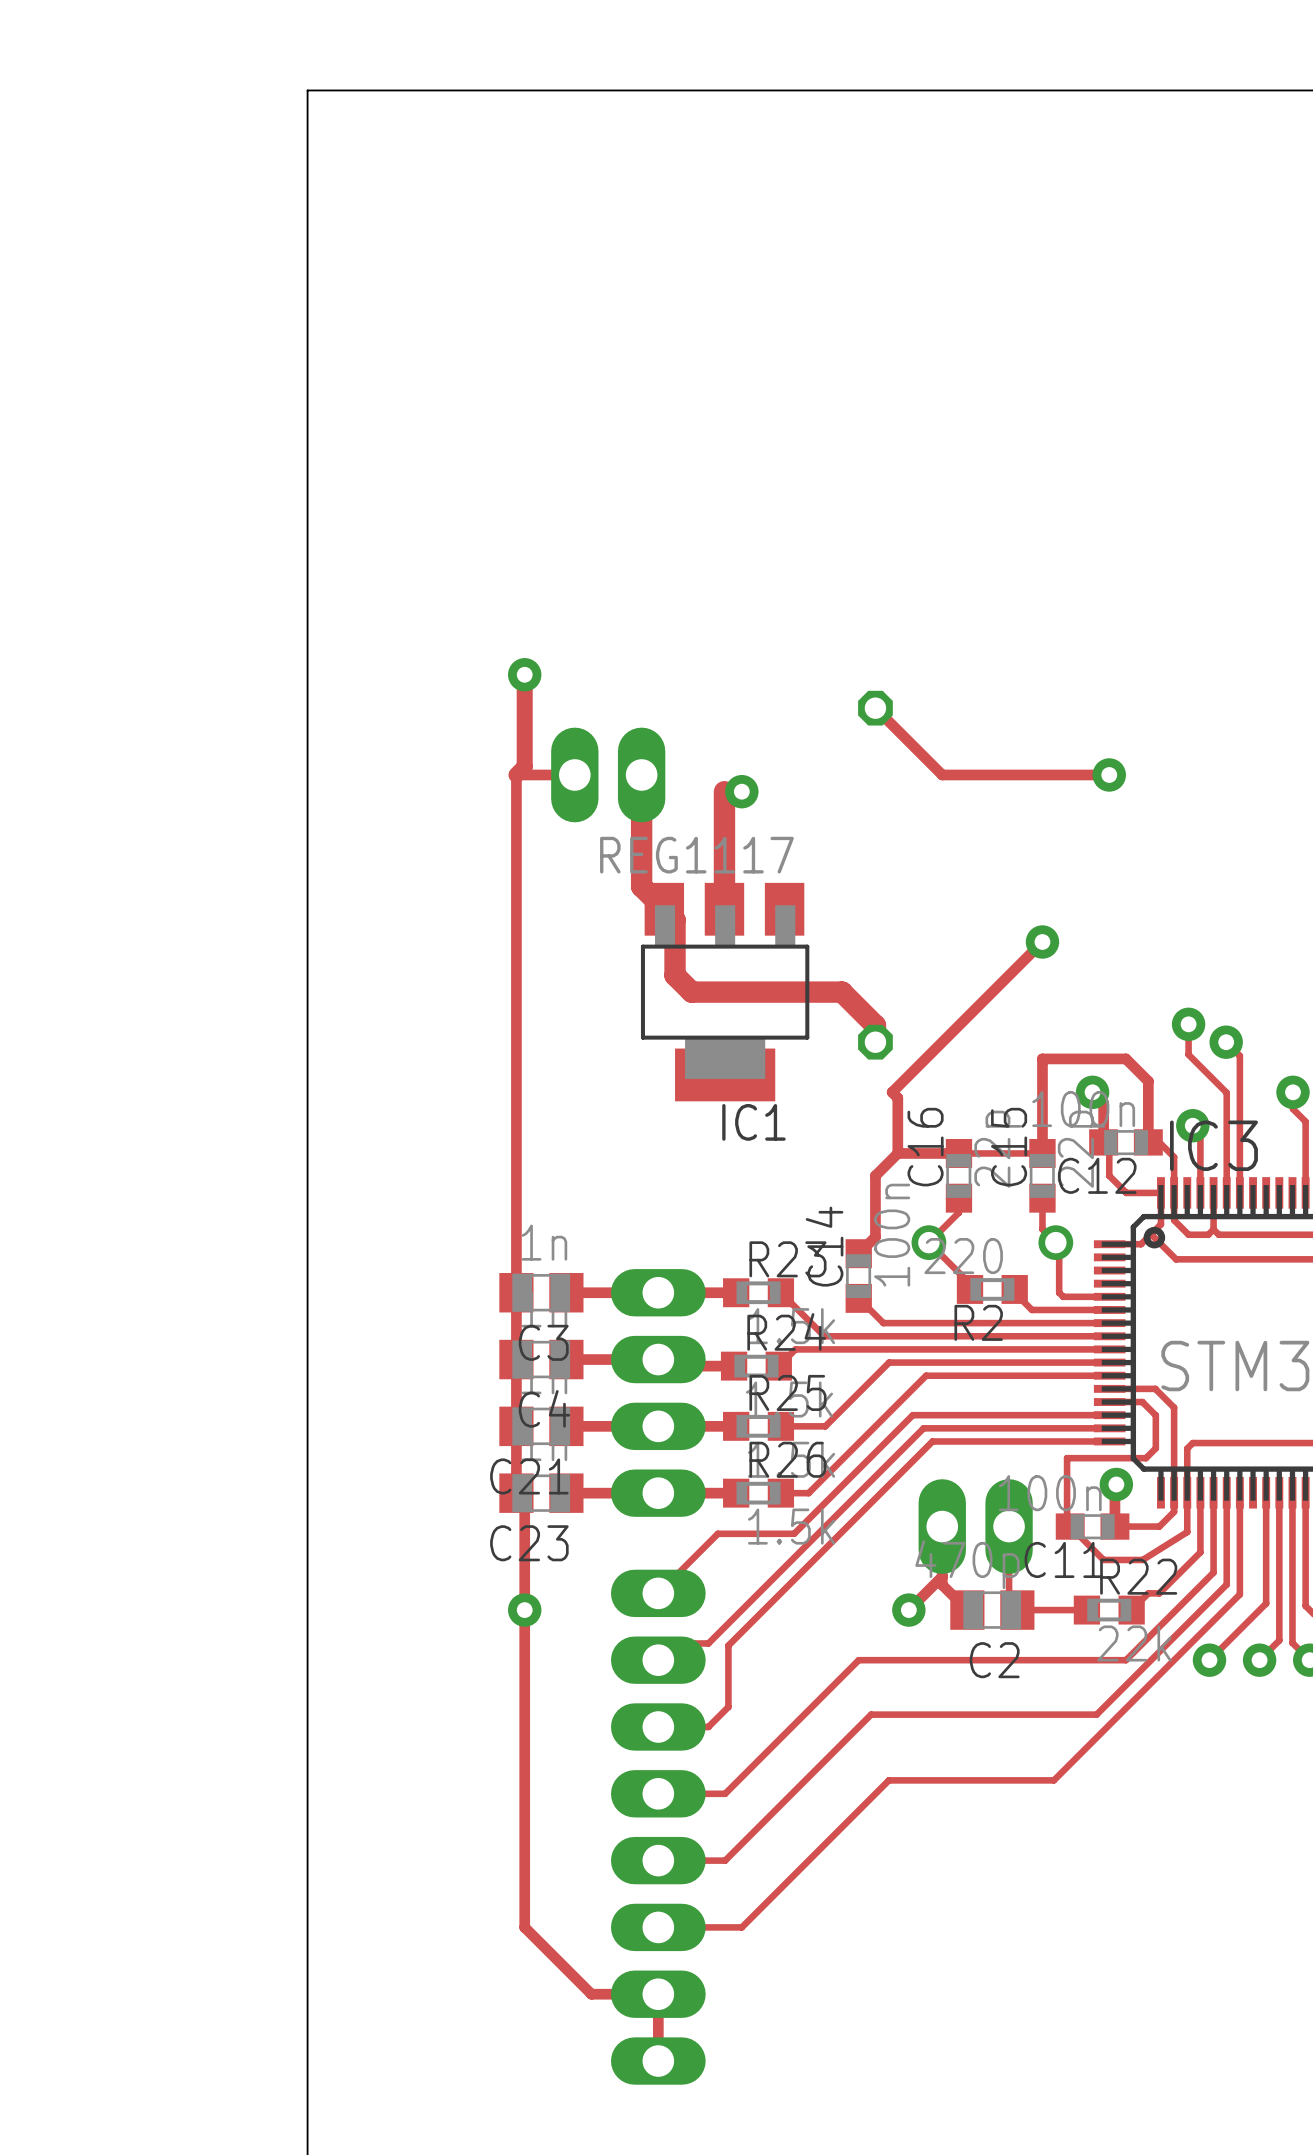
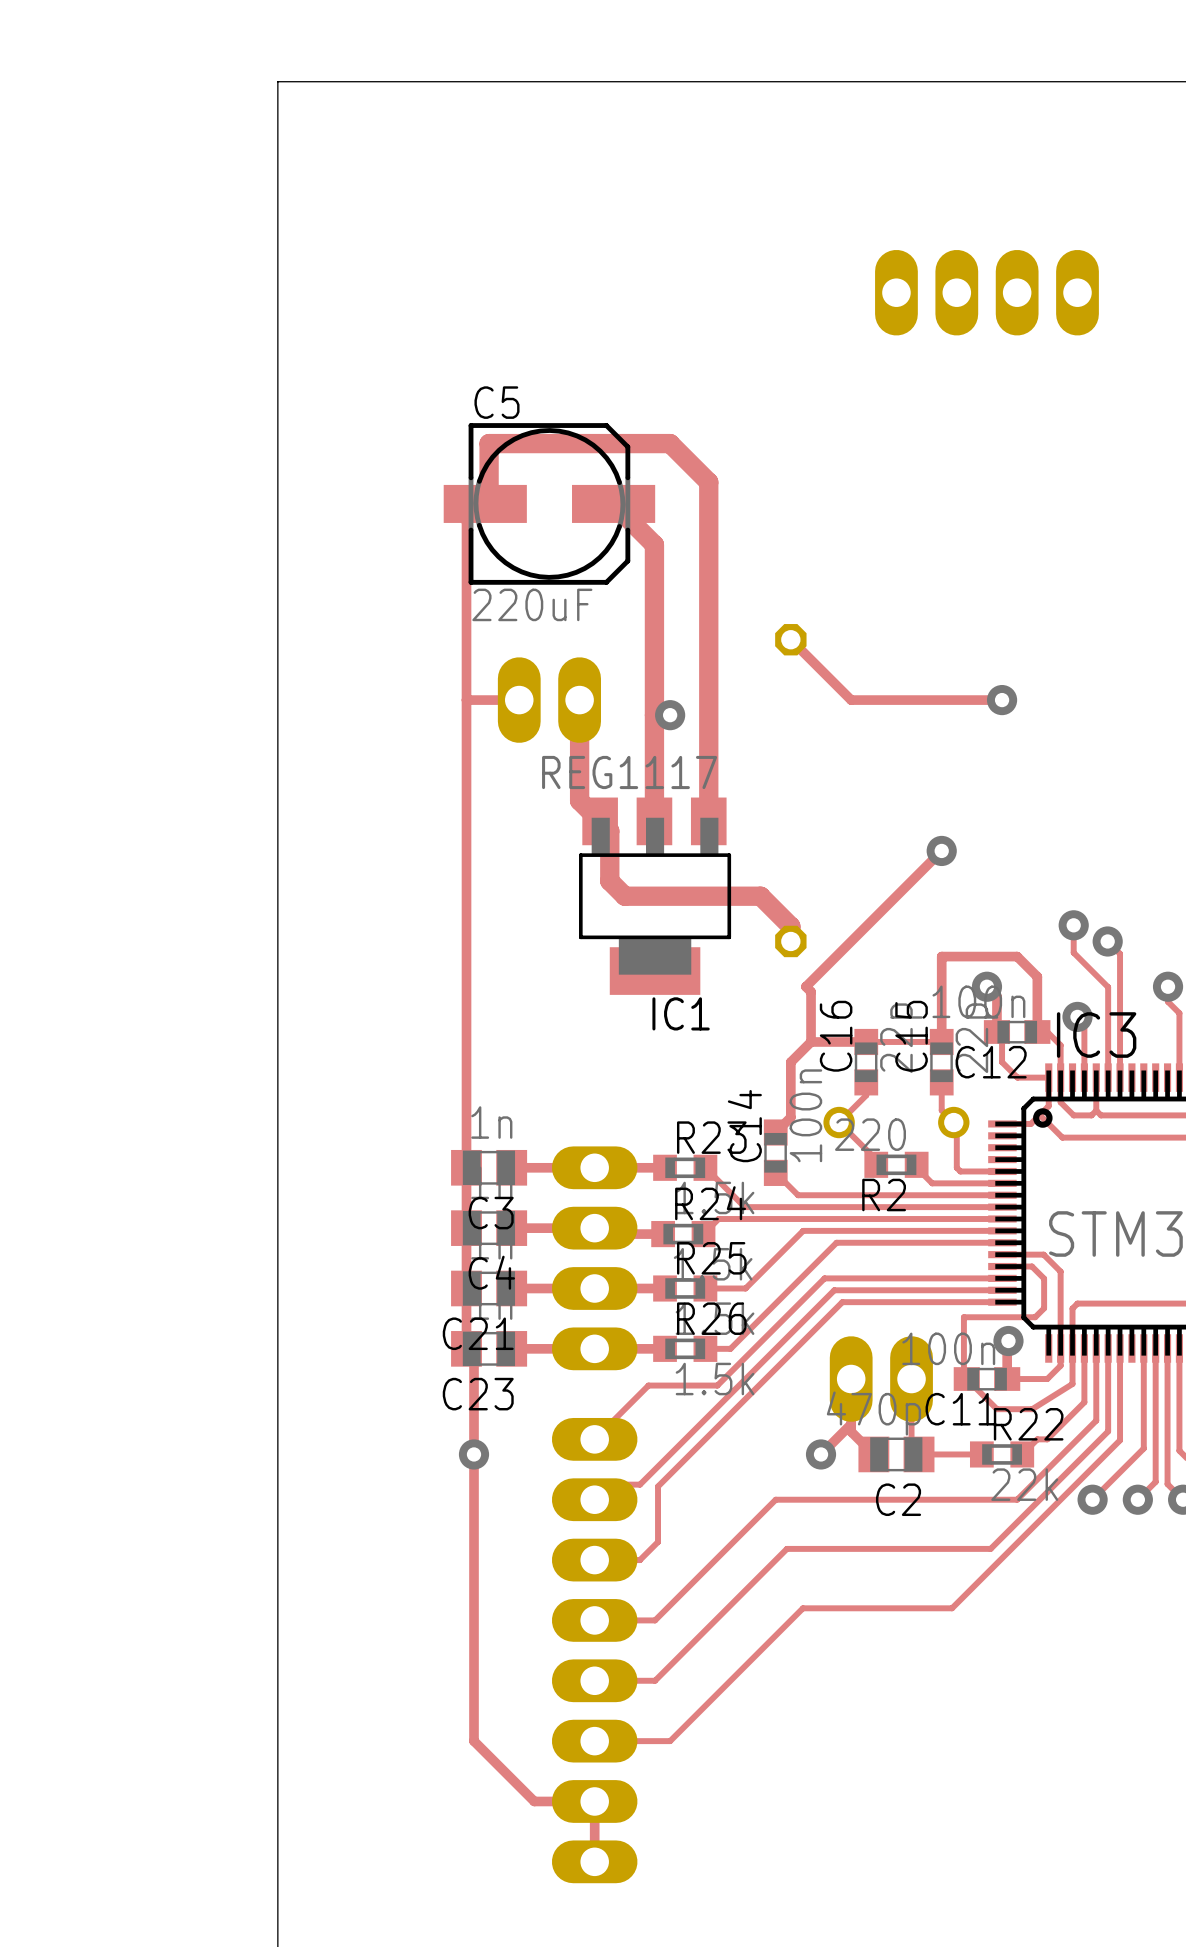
part: none -> (986, 292)
C5: none -> 220uF (549, 503)
track: none -> (613, 503) (654, 544) (654, 715)
track: (524, 674) (524, 766) (516, 774) -> (708, 821) (708, 482) (670, 443) (489, 443) (489, 500) (466, 522) (466, 700)
via: (524, 674) -> none

